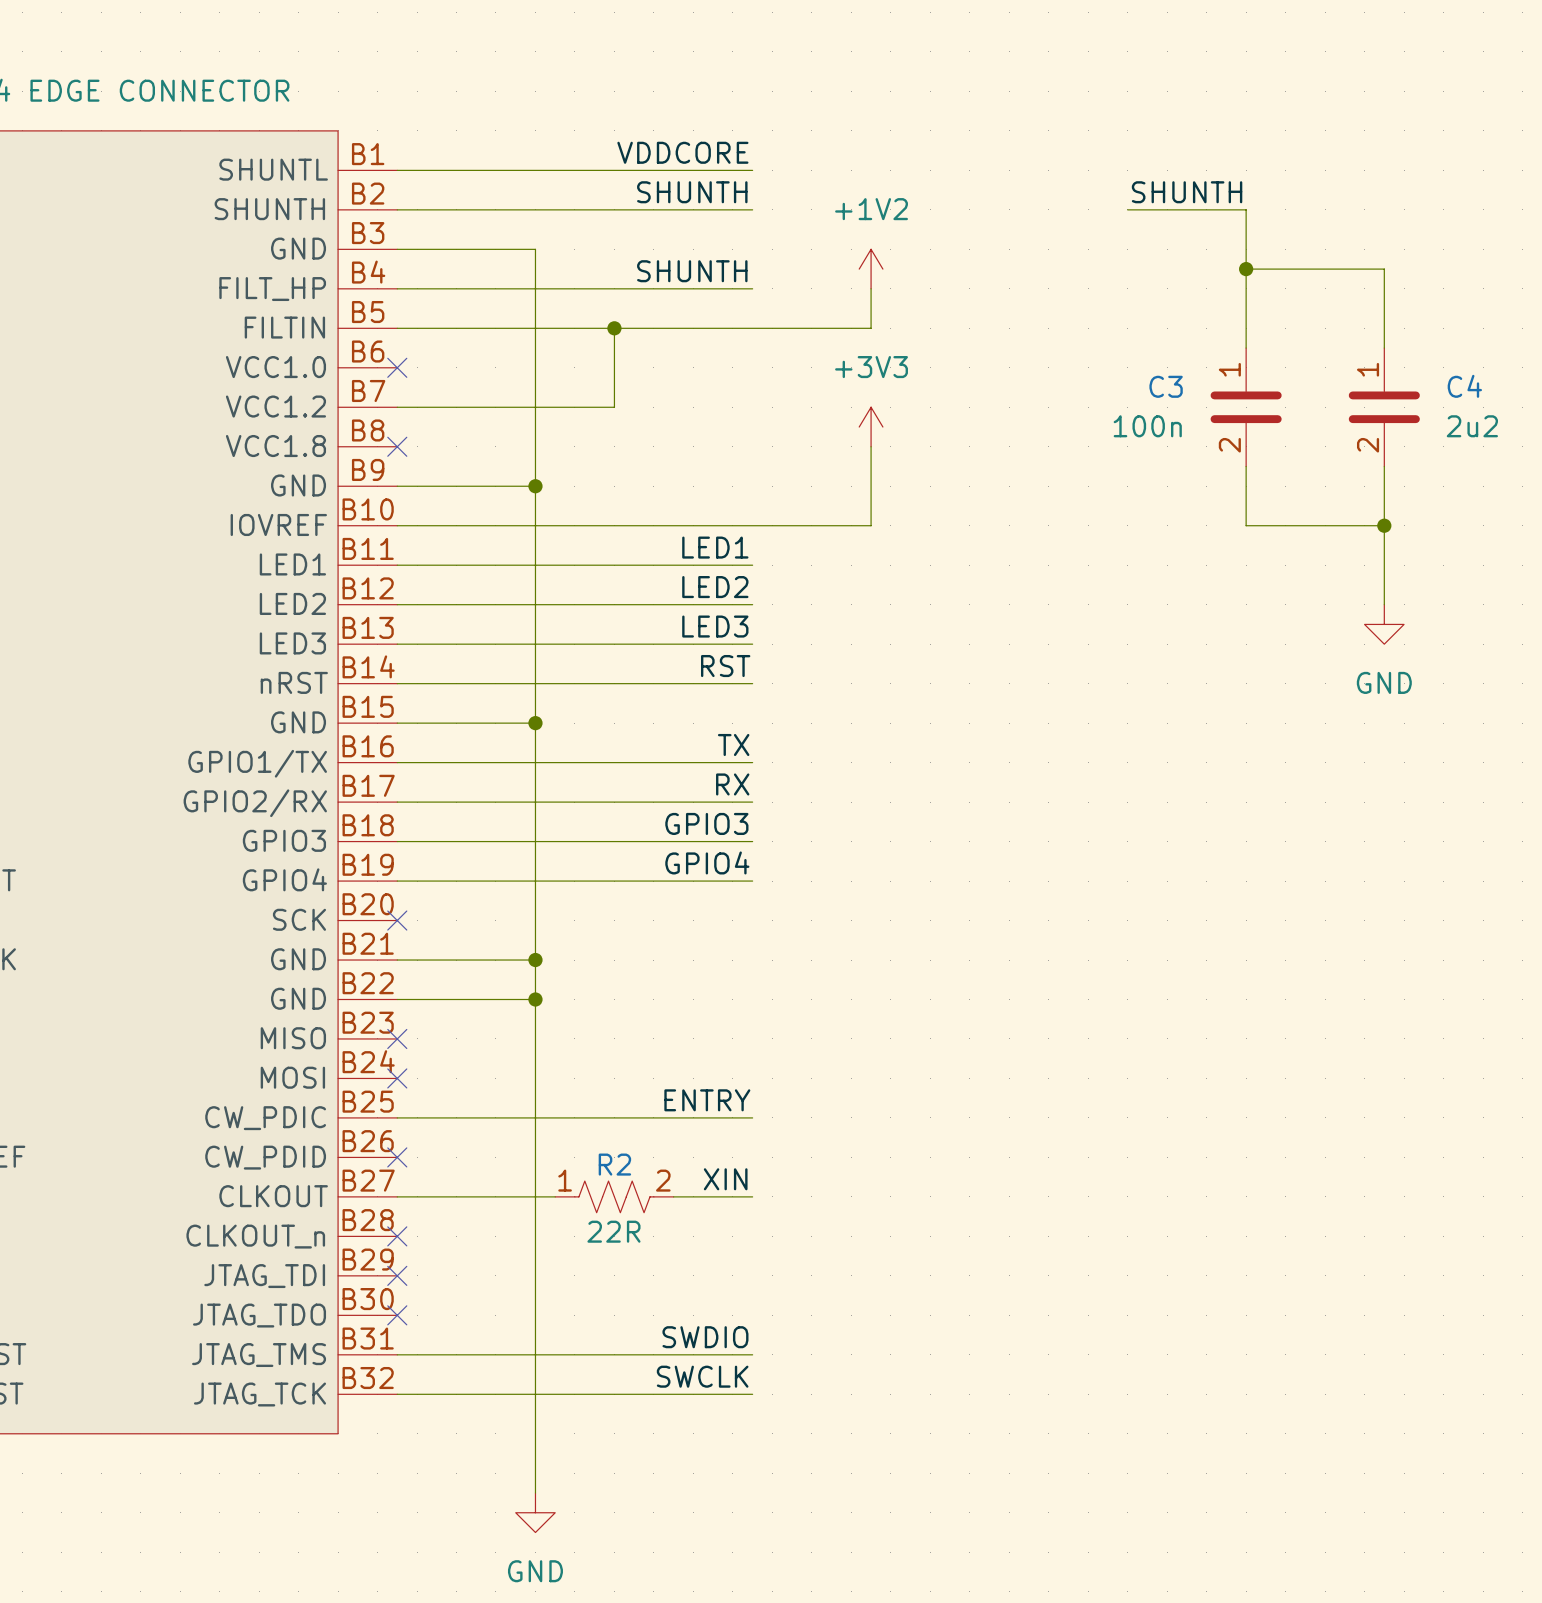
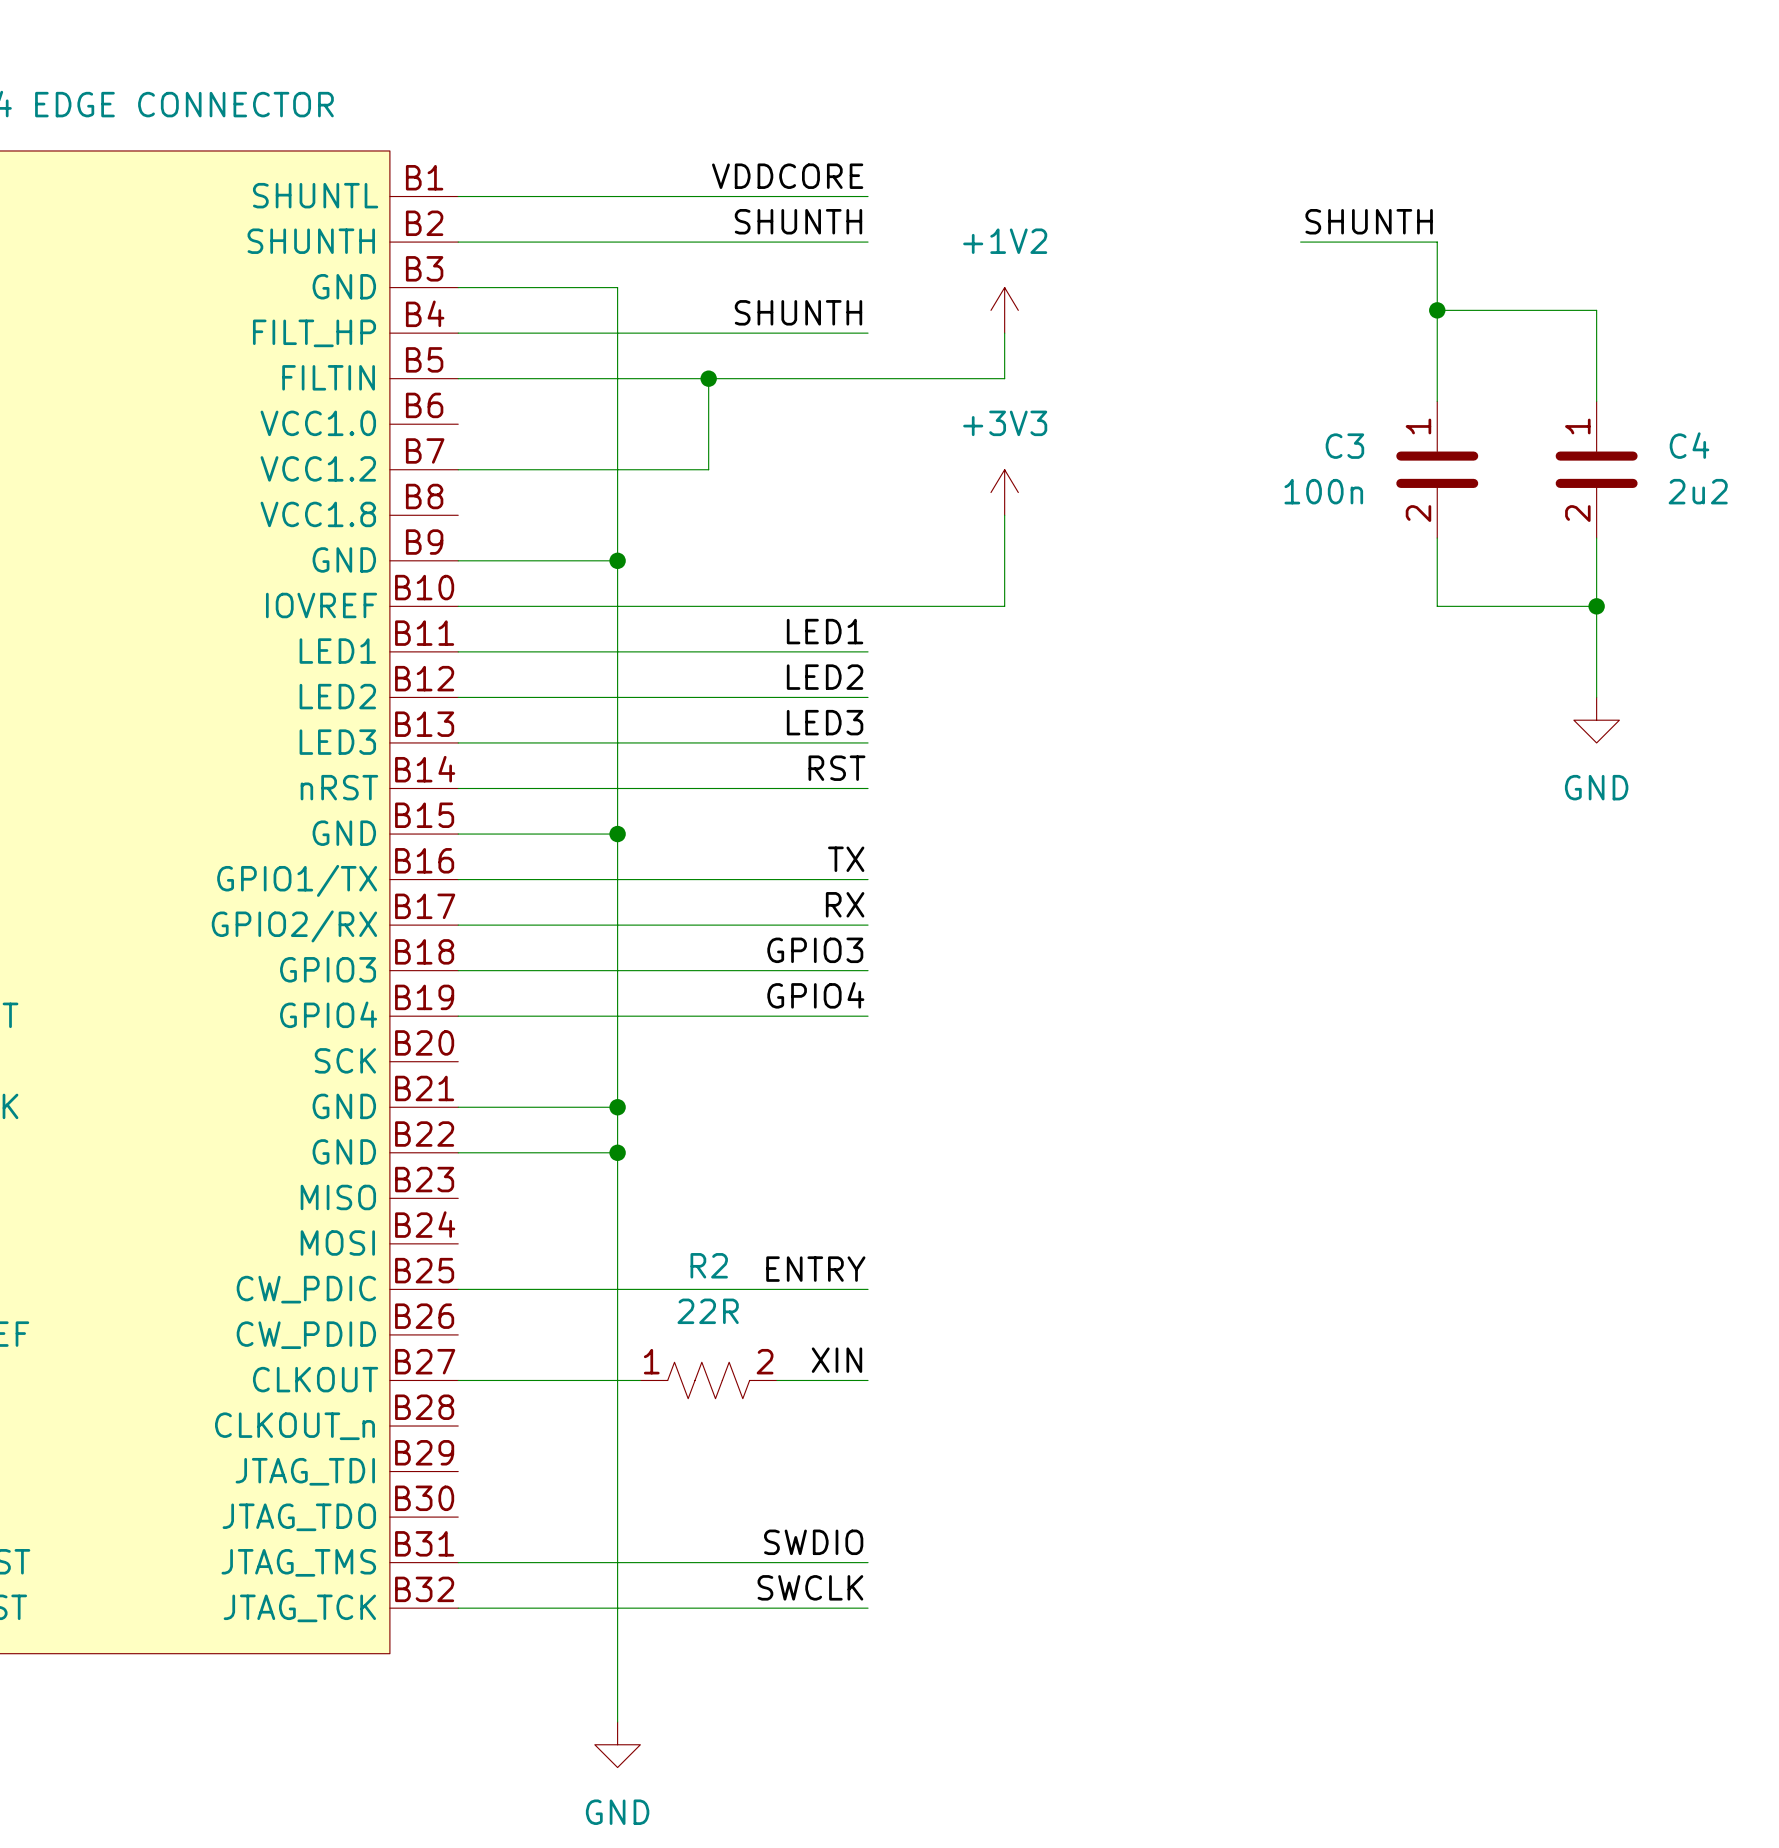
no-connect mark: (397, 367) -> none
no-connect mark: (397, 446) -> none
no-connect mark: (397, 920) -> none
no-connect mark: (397, 1038) -> none
no-connect mark: (397, 1078) -> none
no-connect mark: (397, 1157) -> none
R2 name position: R2 (614, 1164) -> R2 (709, 1265)
R2 text position: 22R (613, 1231) -> 22R (708, 1311)
no-connect mark: (397, 1236) -> none
no-connect mark: (397, 1275) -> none
no-connect mark: (397, 1315) -> none

